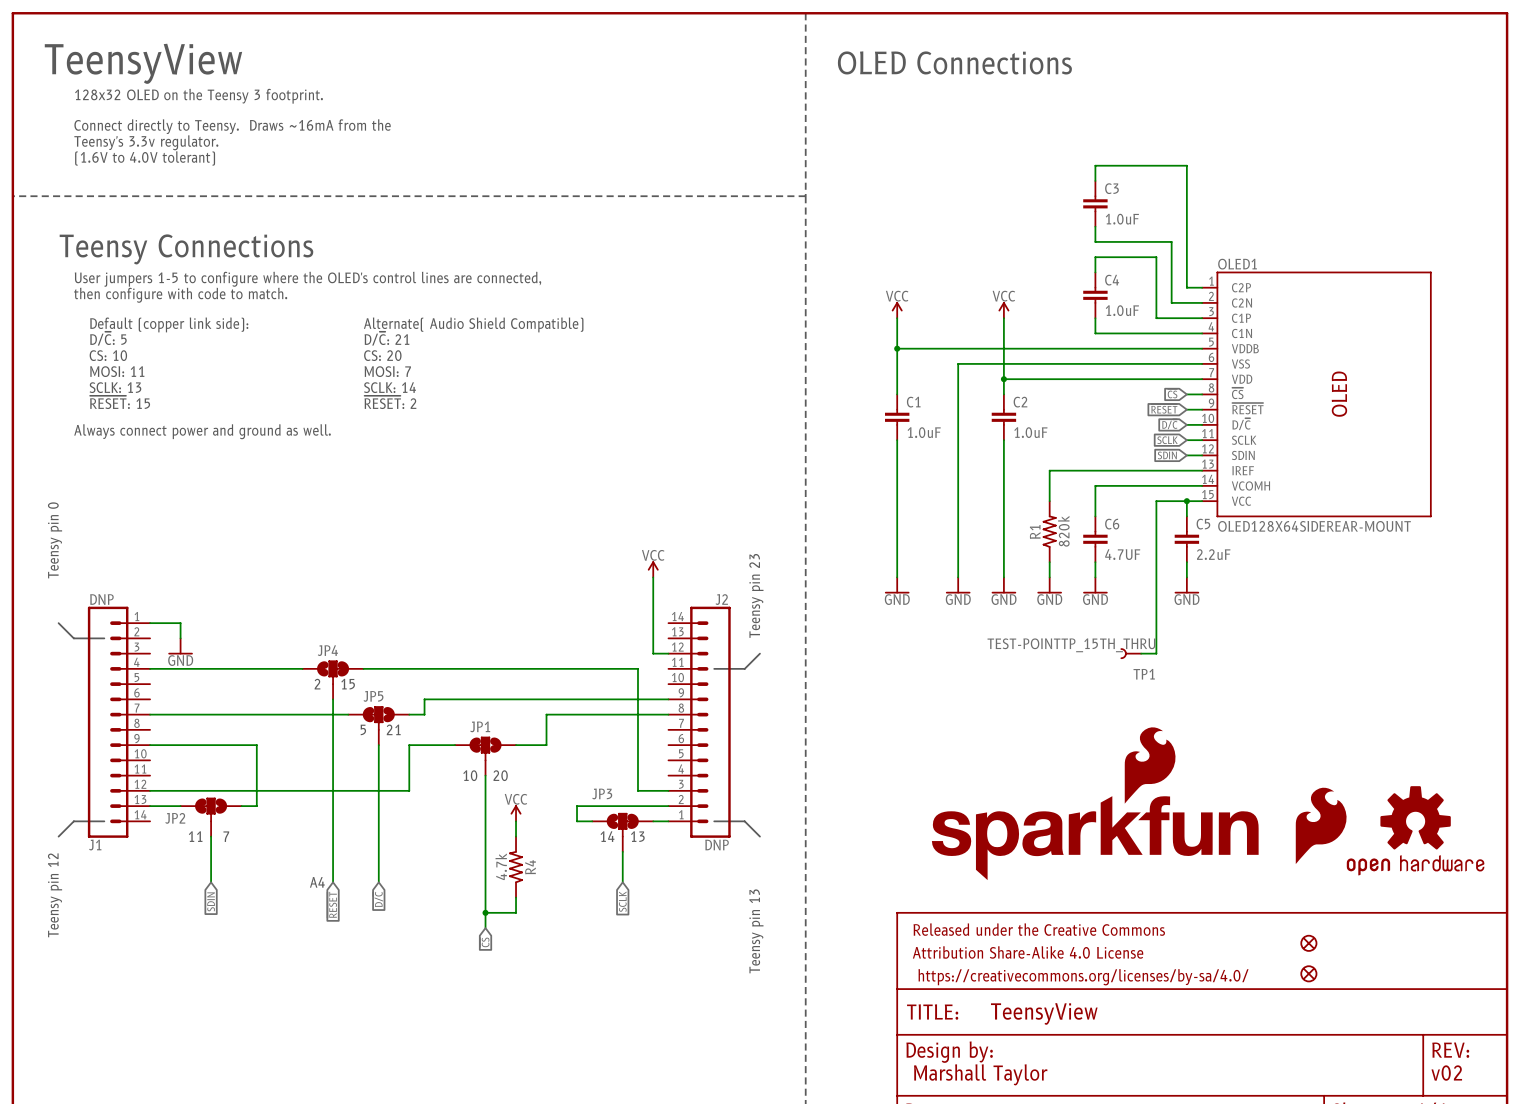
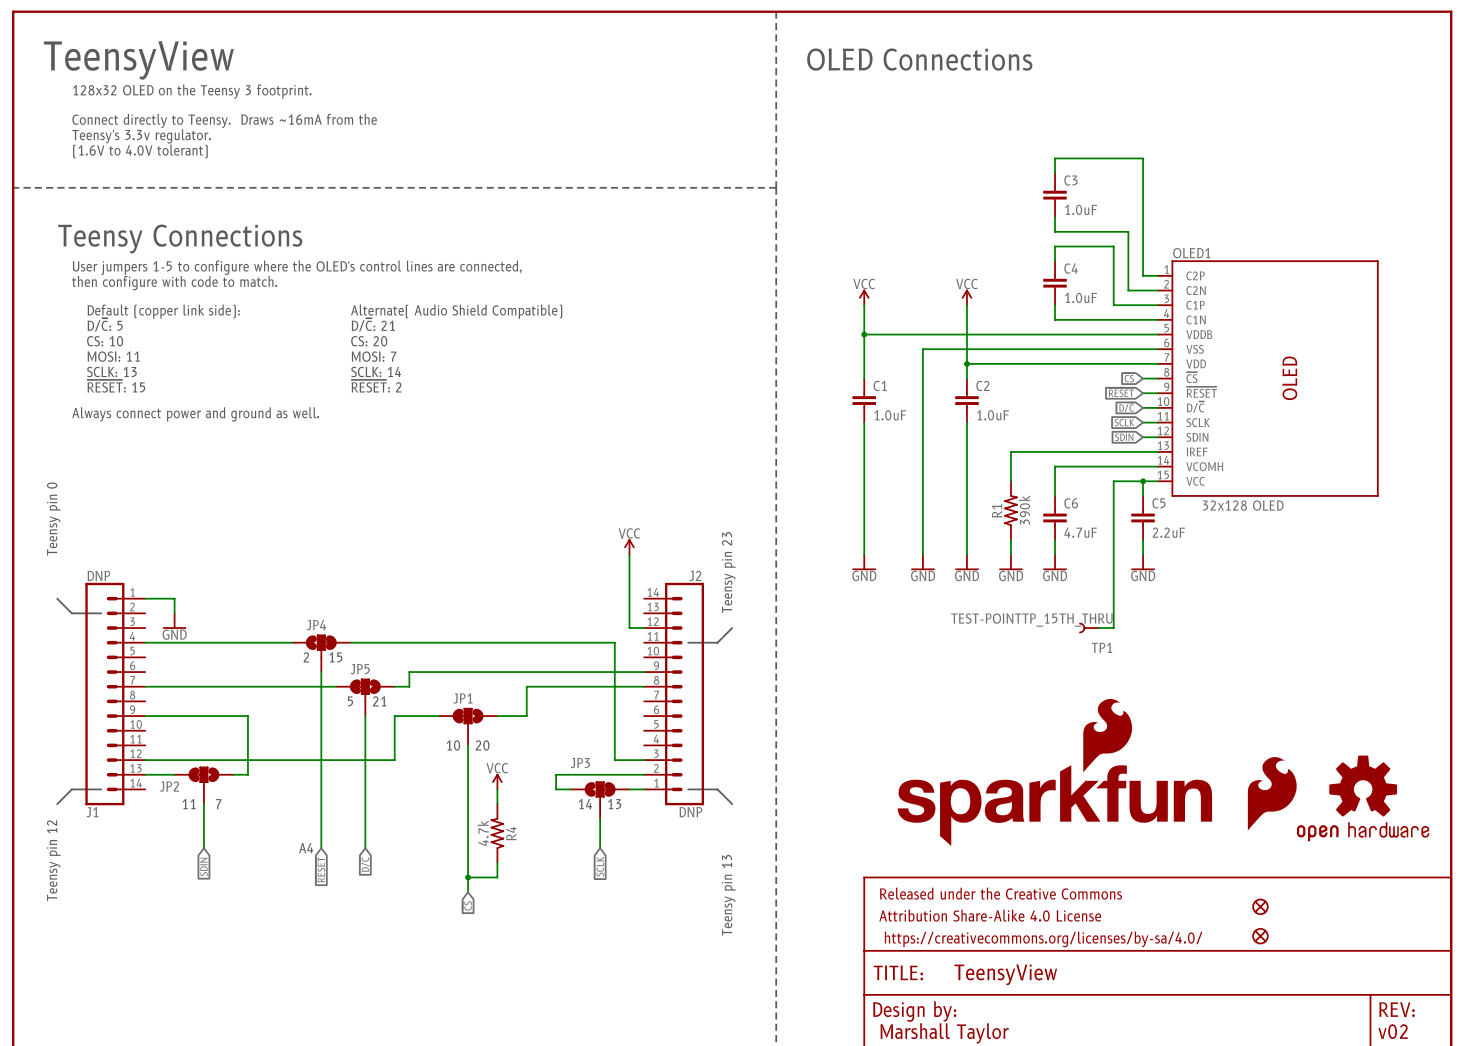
OLED1 value: OLED128X64SIDEREAR-MOUNT (1314, 526) -> 32x128 OLED (1243, 505)
R1 value: 820k (1063, 531) -> 390k (1024, 510)
C6 value: 4.7UF (1122, 554) -> 4.7uF (1080, 532)

